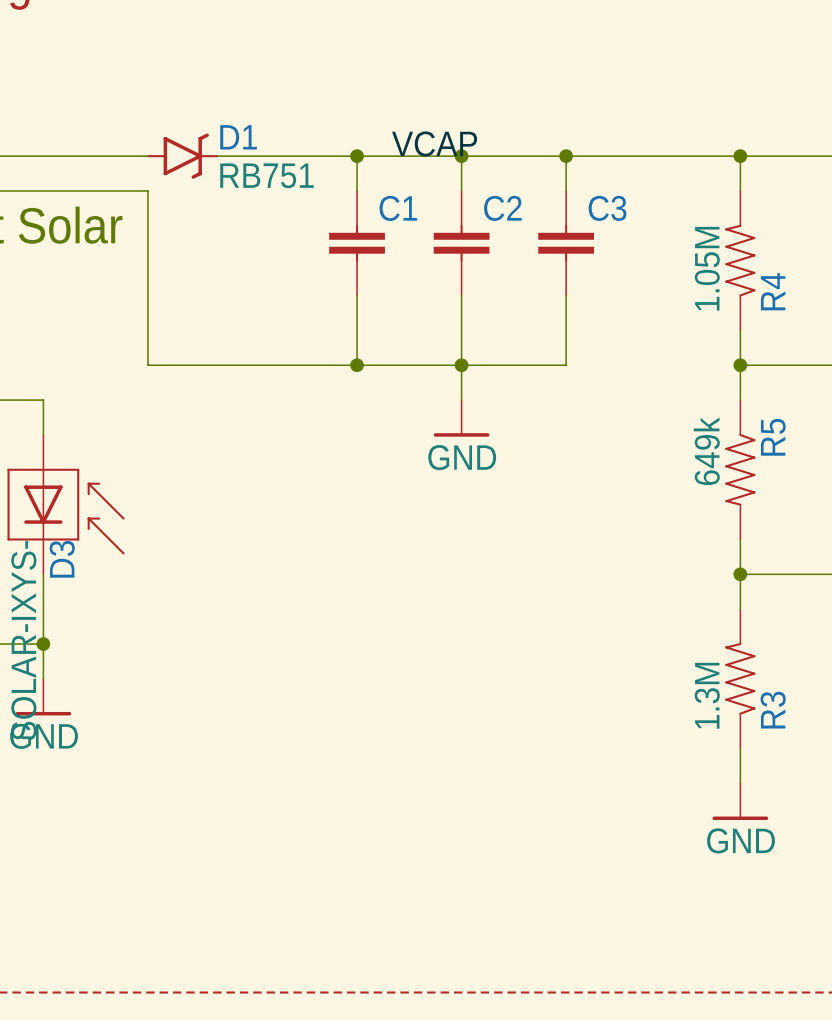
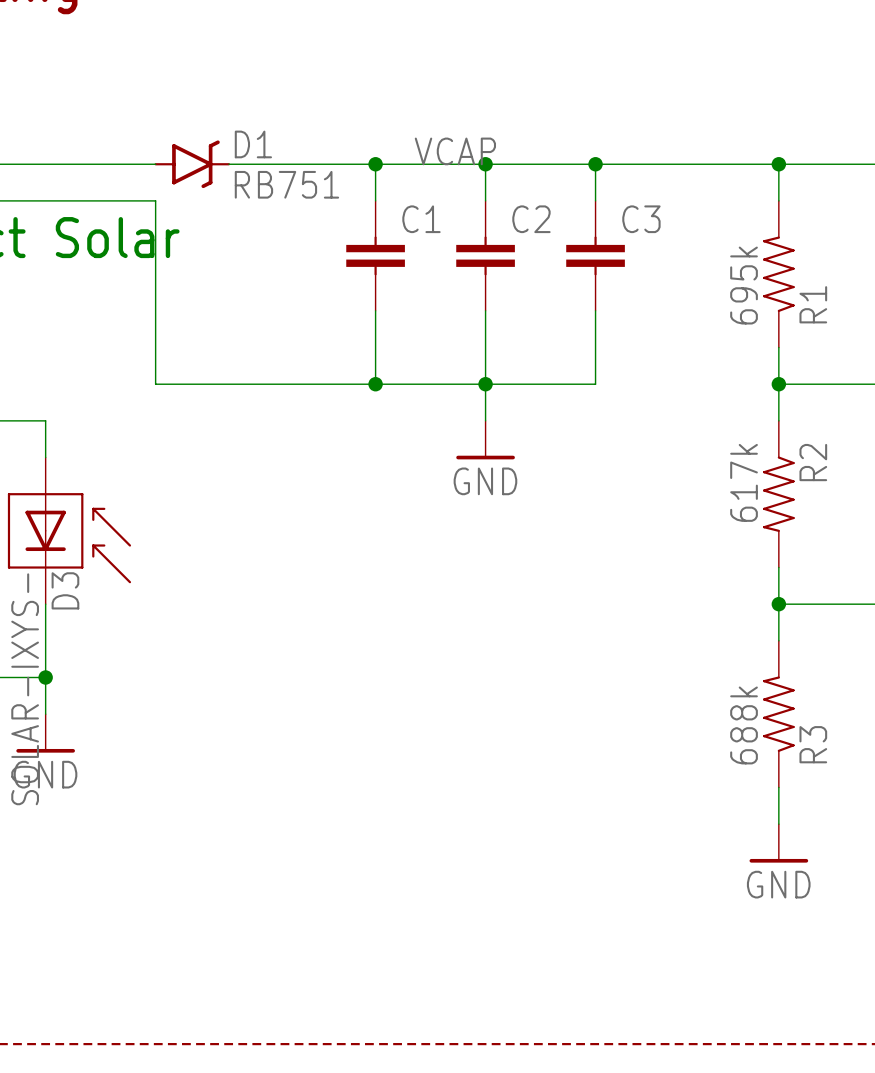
R4 value: 1.05M (707, 268) -> 695k (744, 285)
R4 name: R4 (773, 291) -> R1 (813, 304)
R5 name: R5 (773, 437) -> R2 (813, 462)
R5 value: 649k (706, 451) -> 617k (744, 482)
R3 value: 1.3M (707, 695) -> 688k (744, 725)

